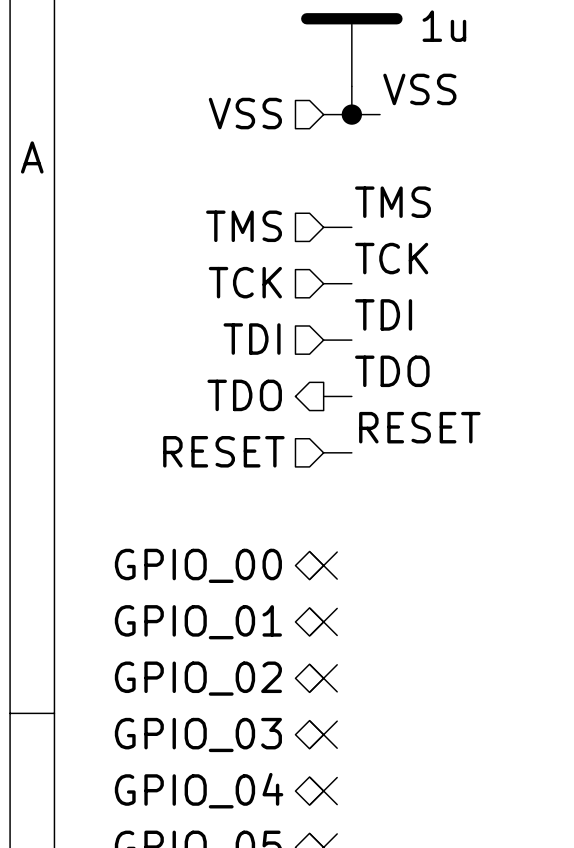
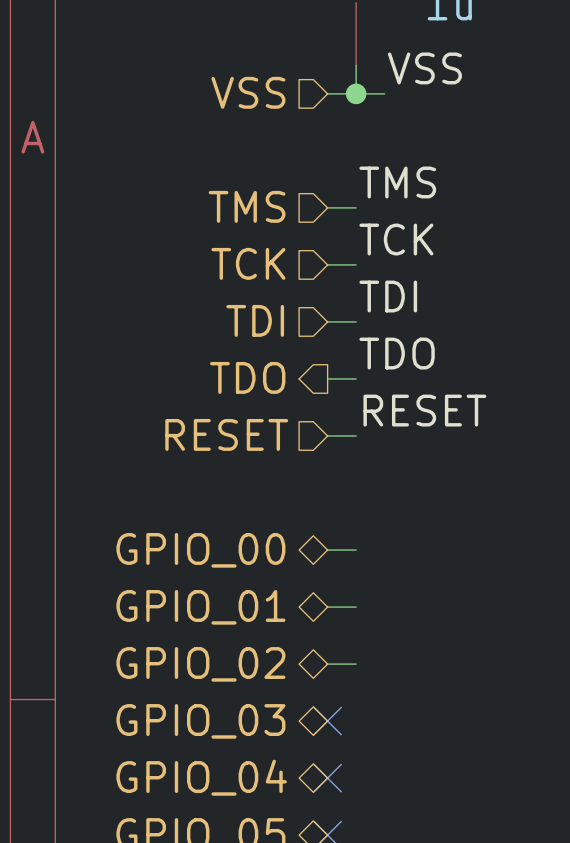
wire: none -> (327, 550) (356, 550)
no-connect mark: (323, 565) -> none
wire: none -> (327, 607) (356, 607)
no-connect mark: (323, 621) -> none
wire: none -> (327, 664) (356, 664)
no-connect mark: (323, 678) -> none

